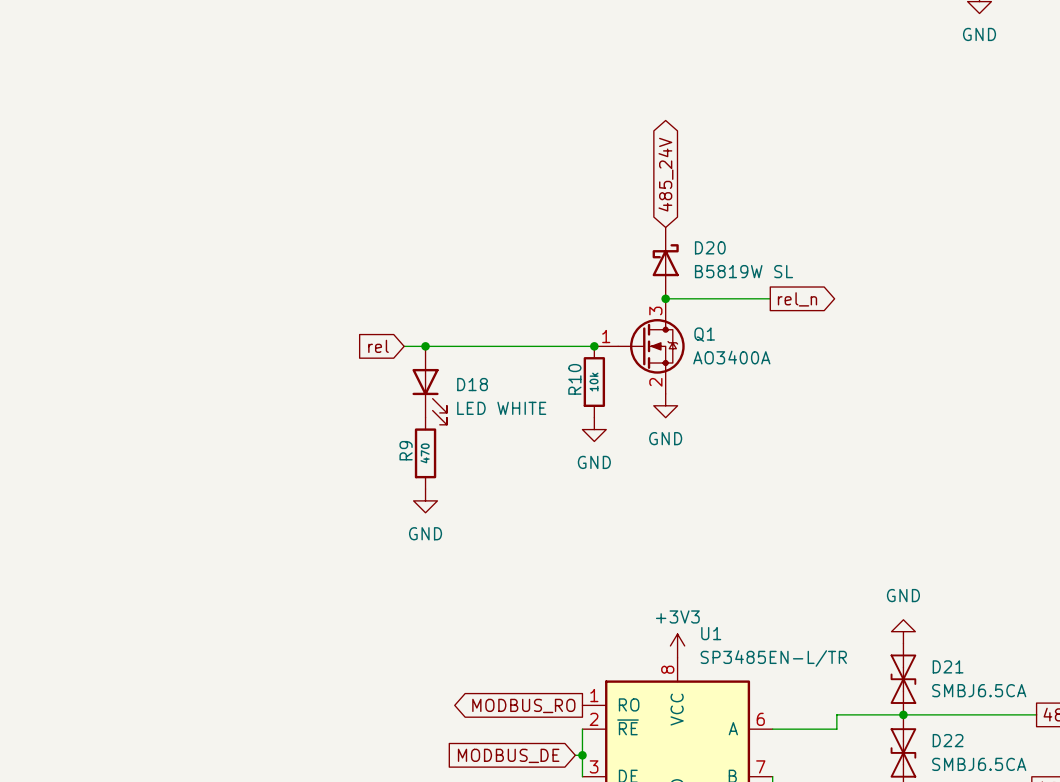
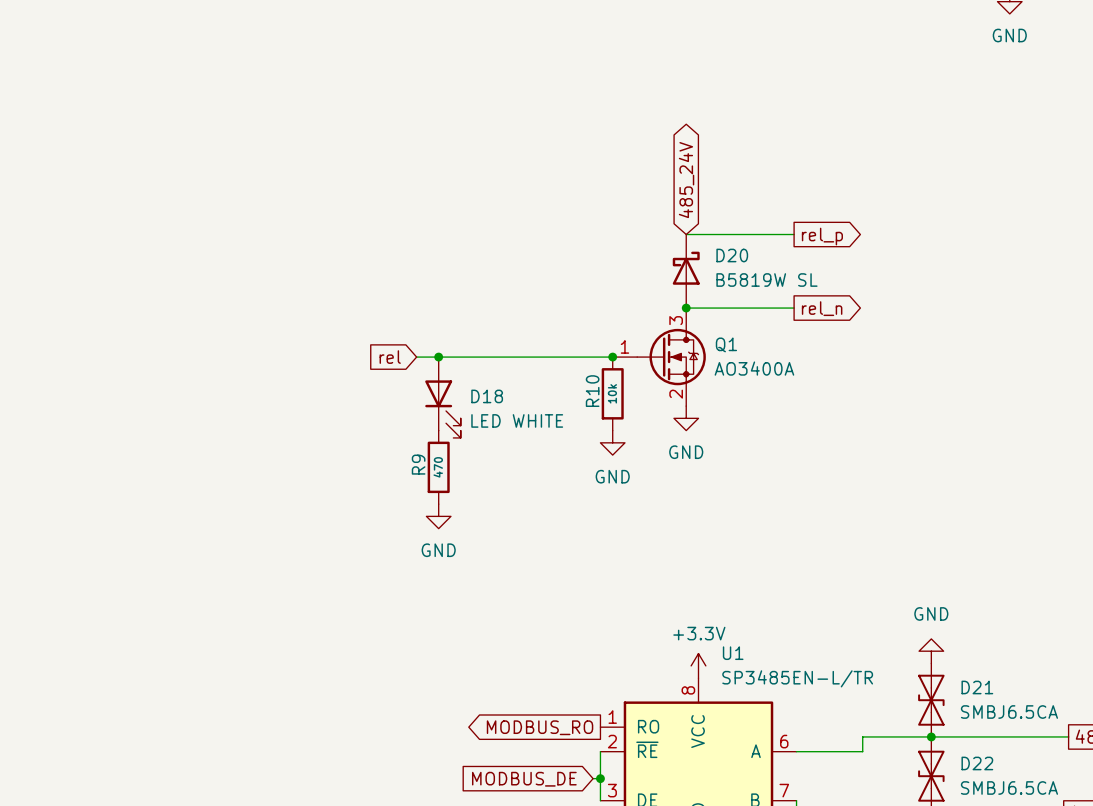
wire: none -> (686, 234) (794, 234)
global label: none -> rel_p (822, 236)
power symbol: +3V3 (677, 645) -> +3.3V (698, 665)

